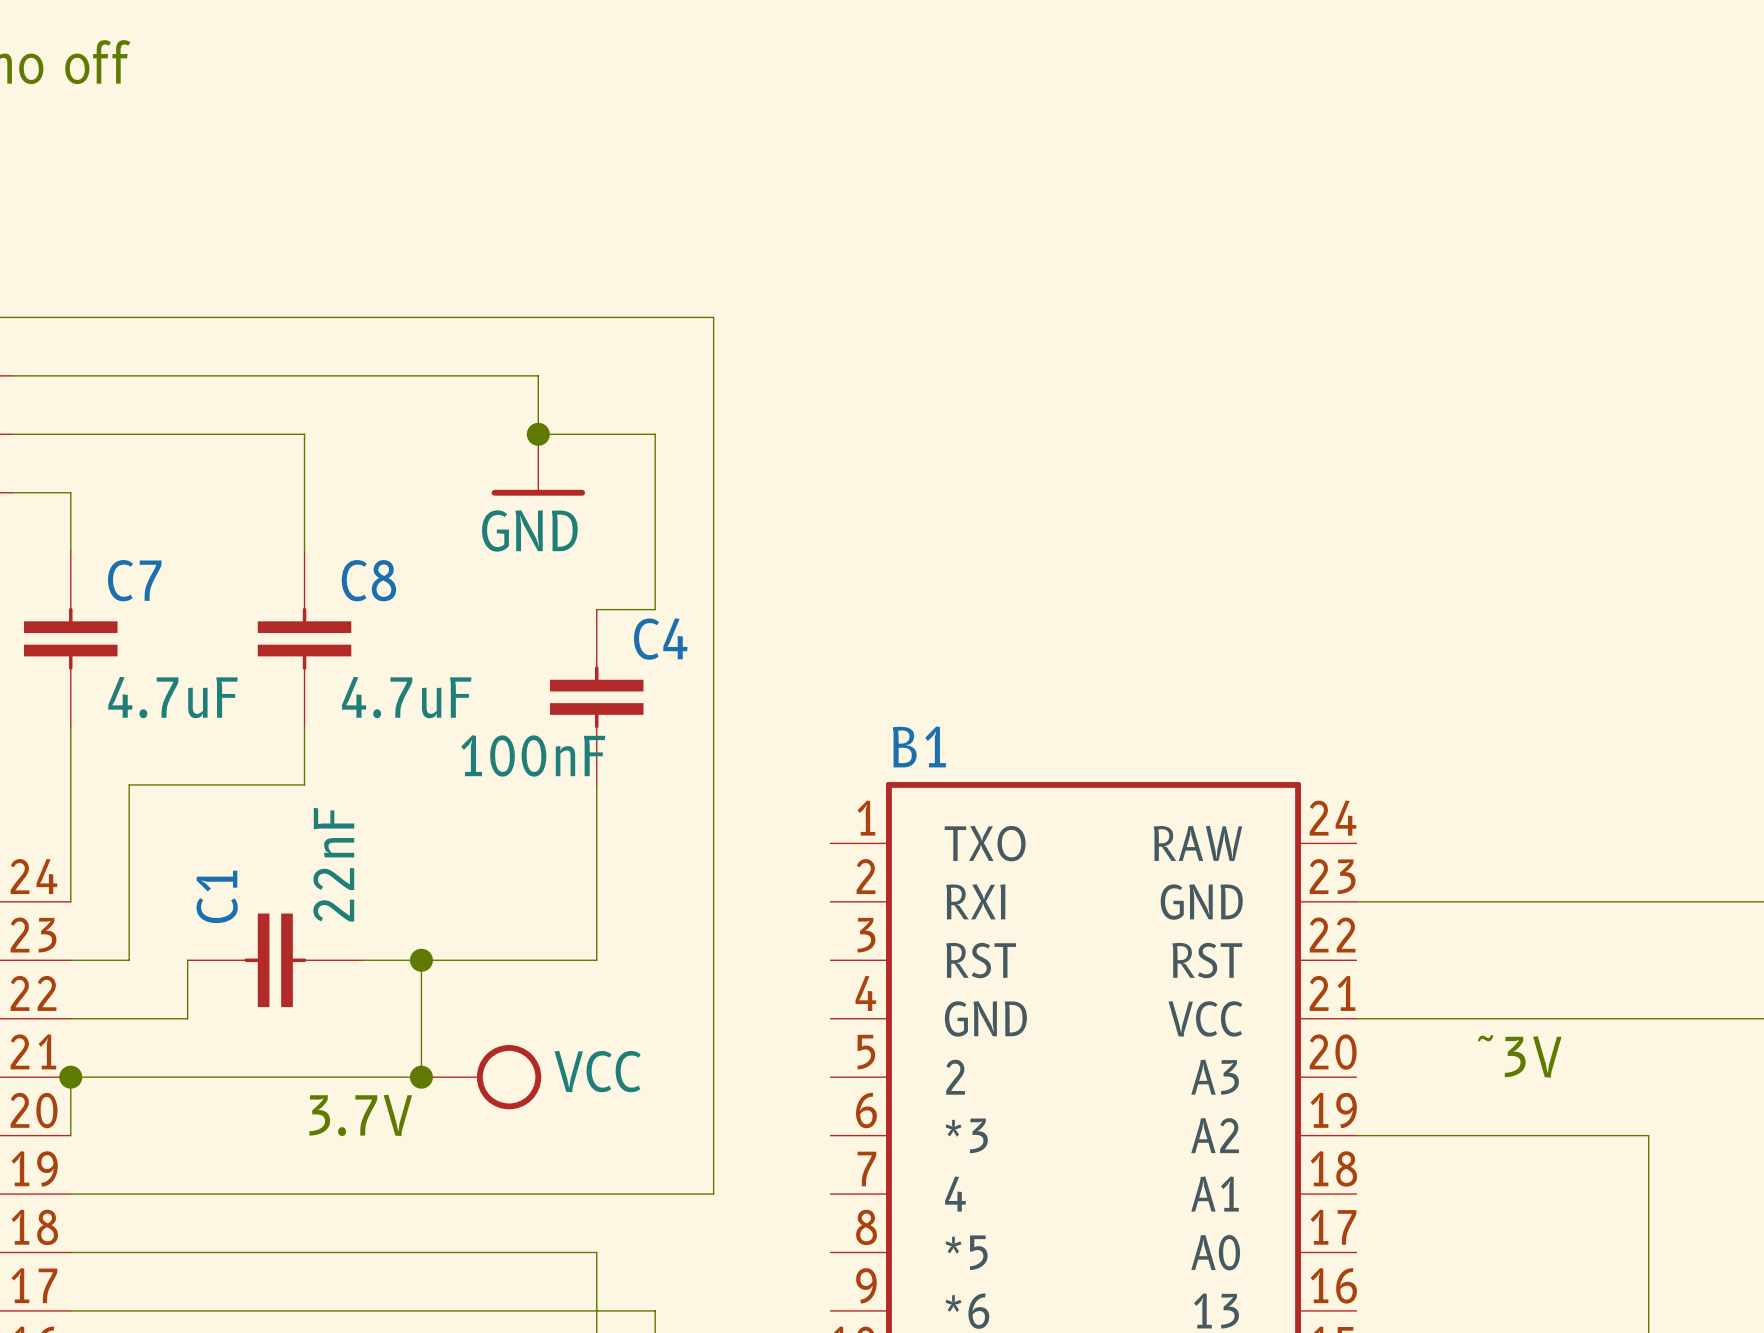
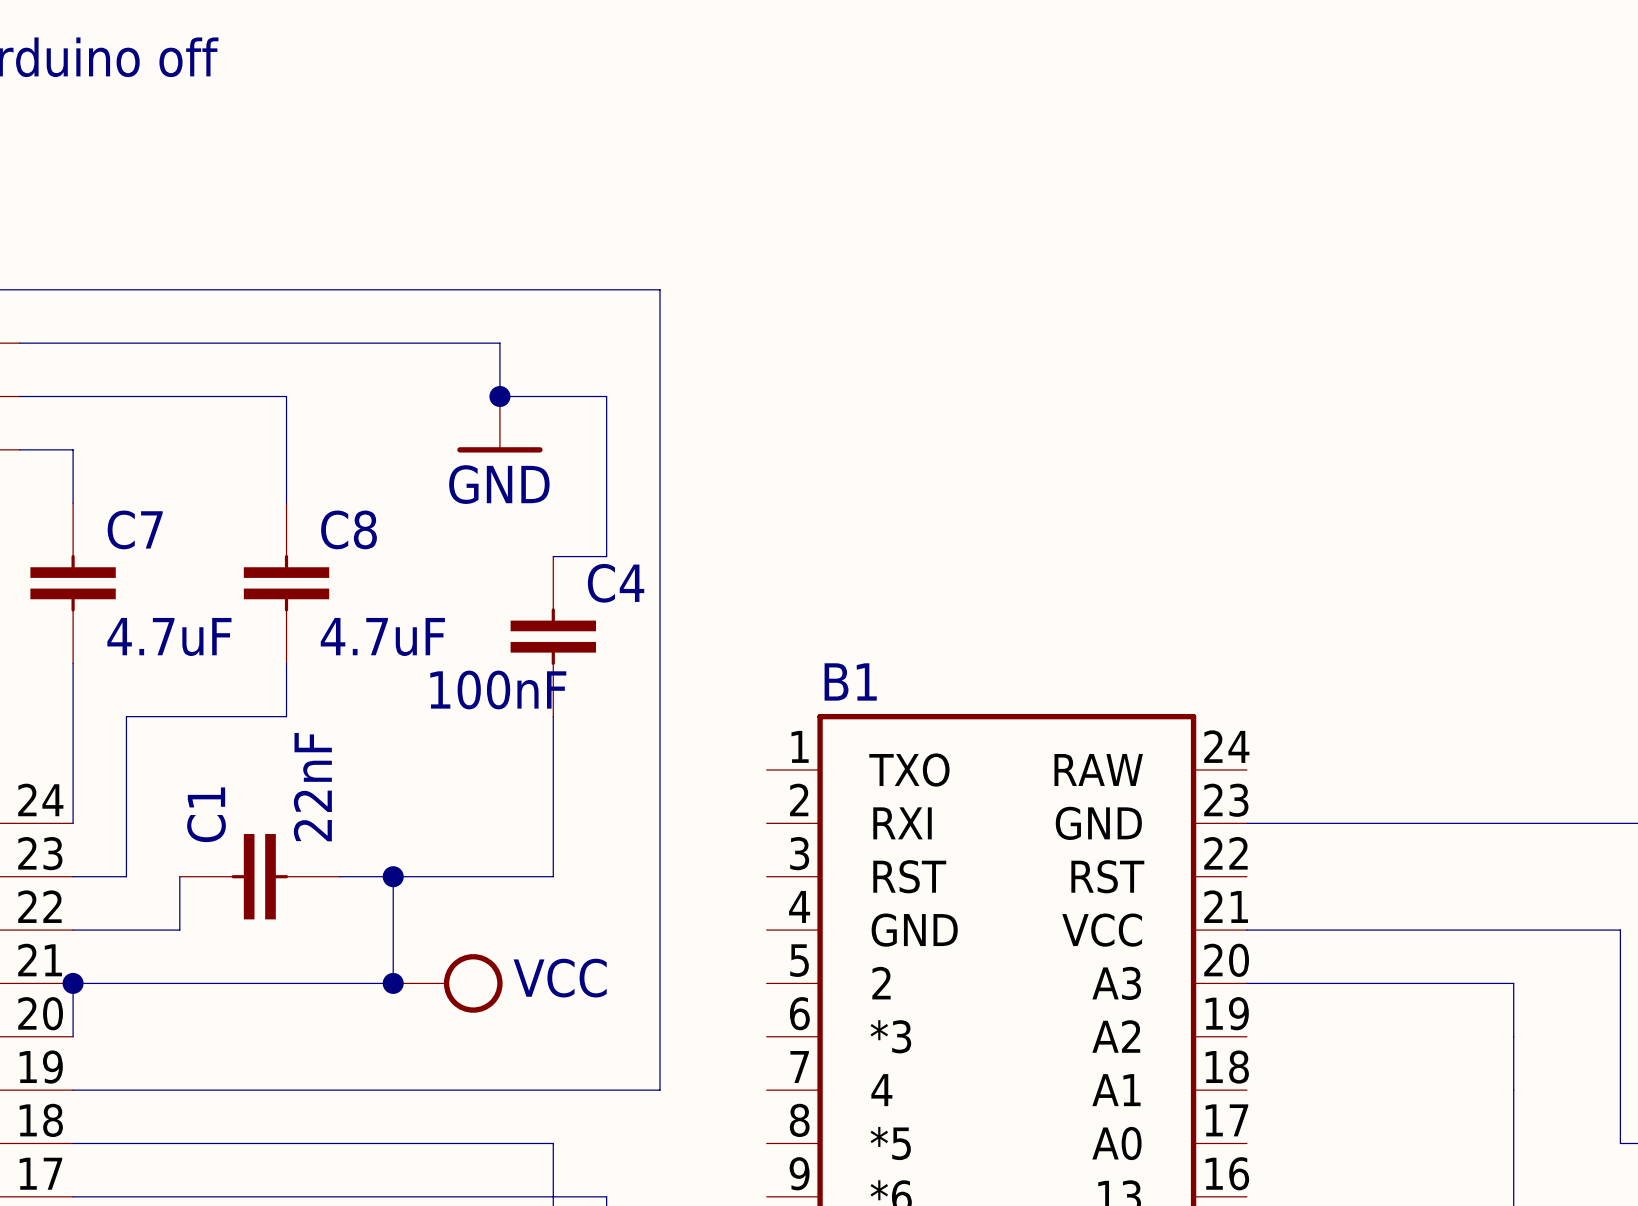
text: ˜3V (1519, 1056) -> none
text: 3.7V (360, 1115) -> none
wire: (1356, 1135) (1648, 1135) -> (1246, 983) (1513, 983) (1513, 1036)

